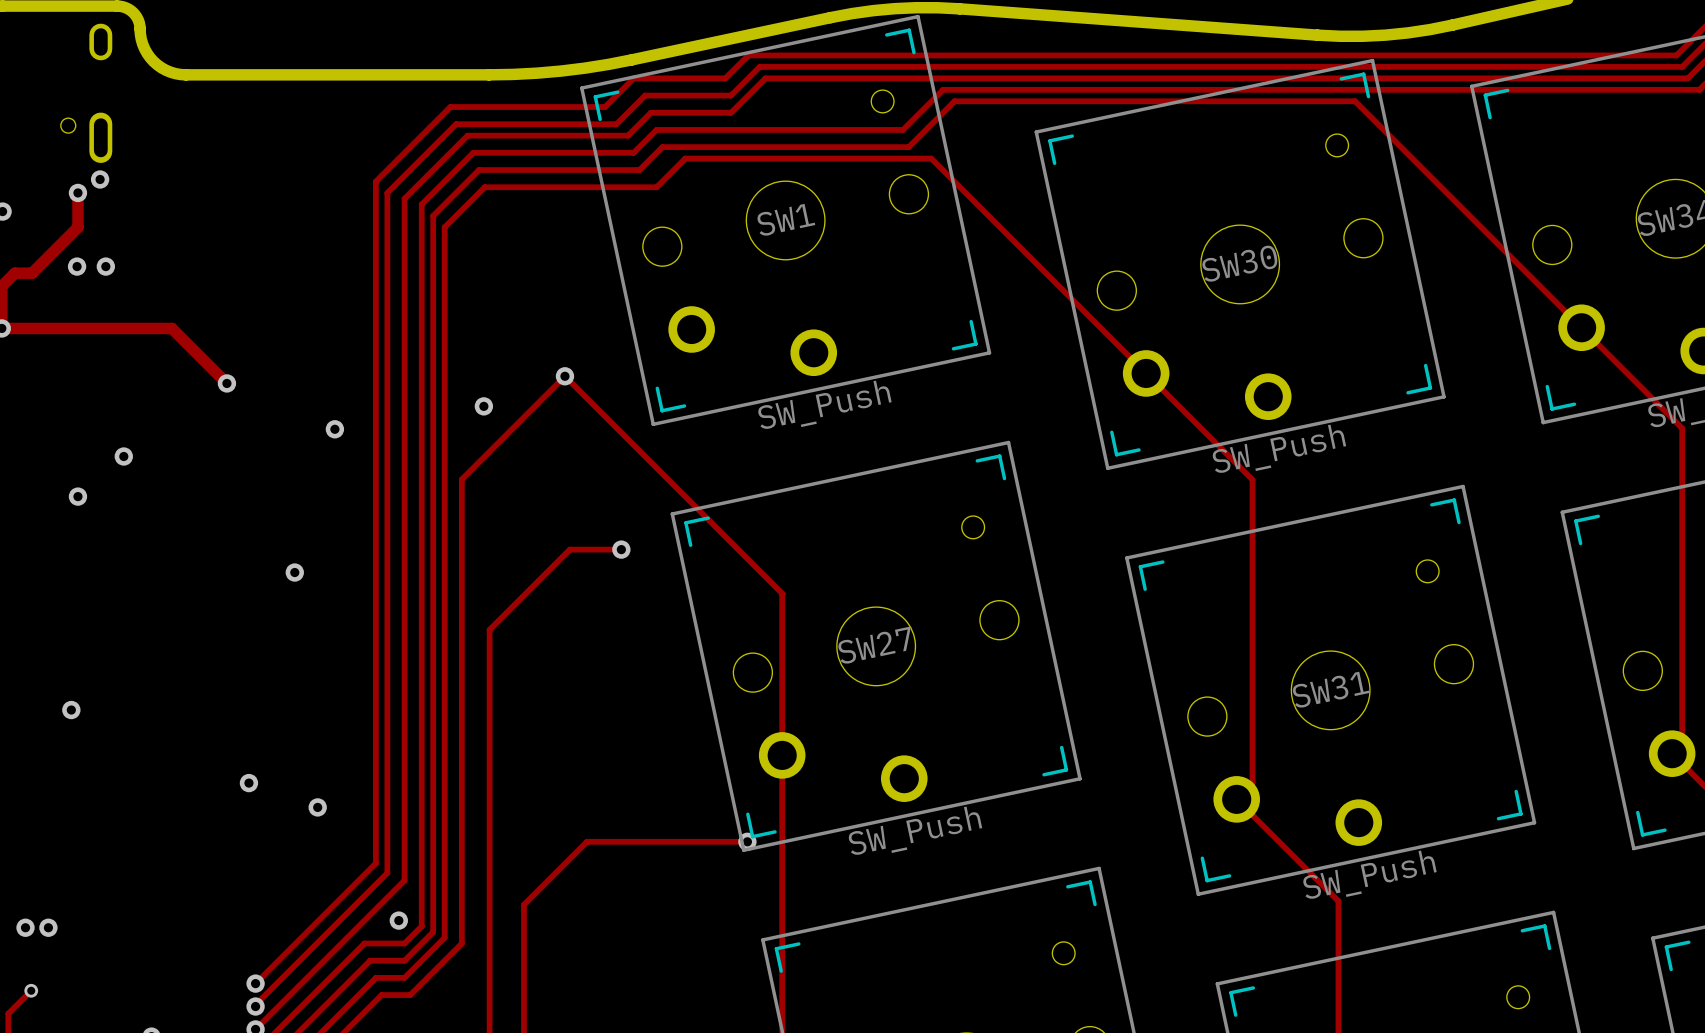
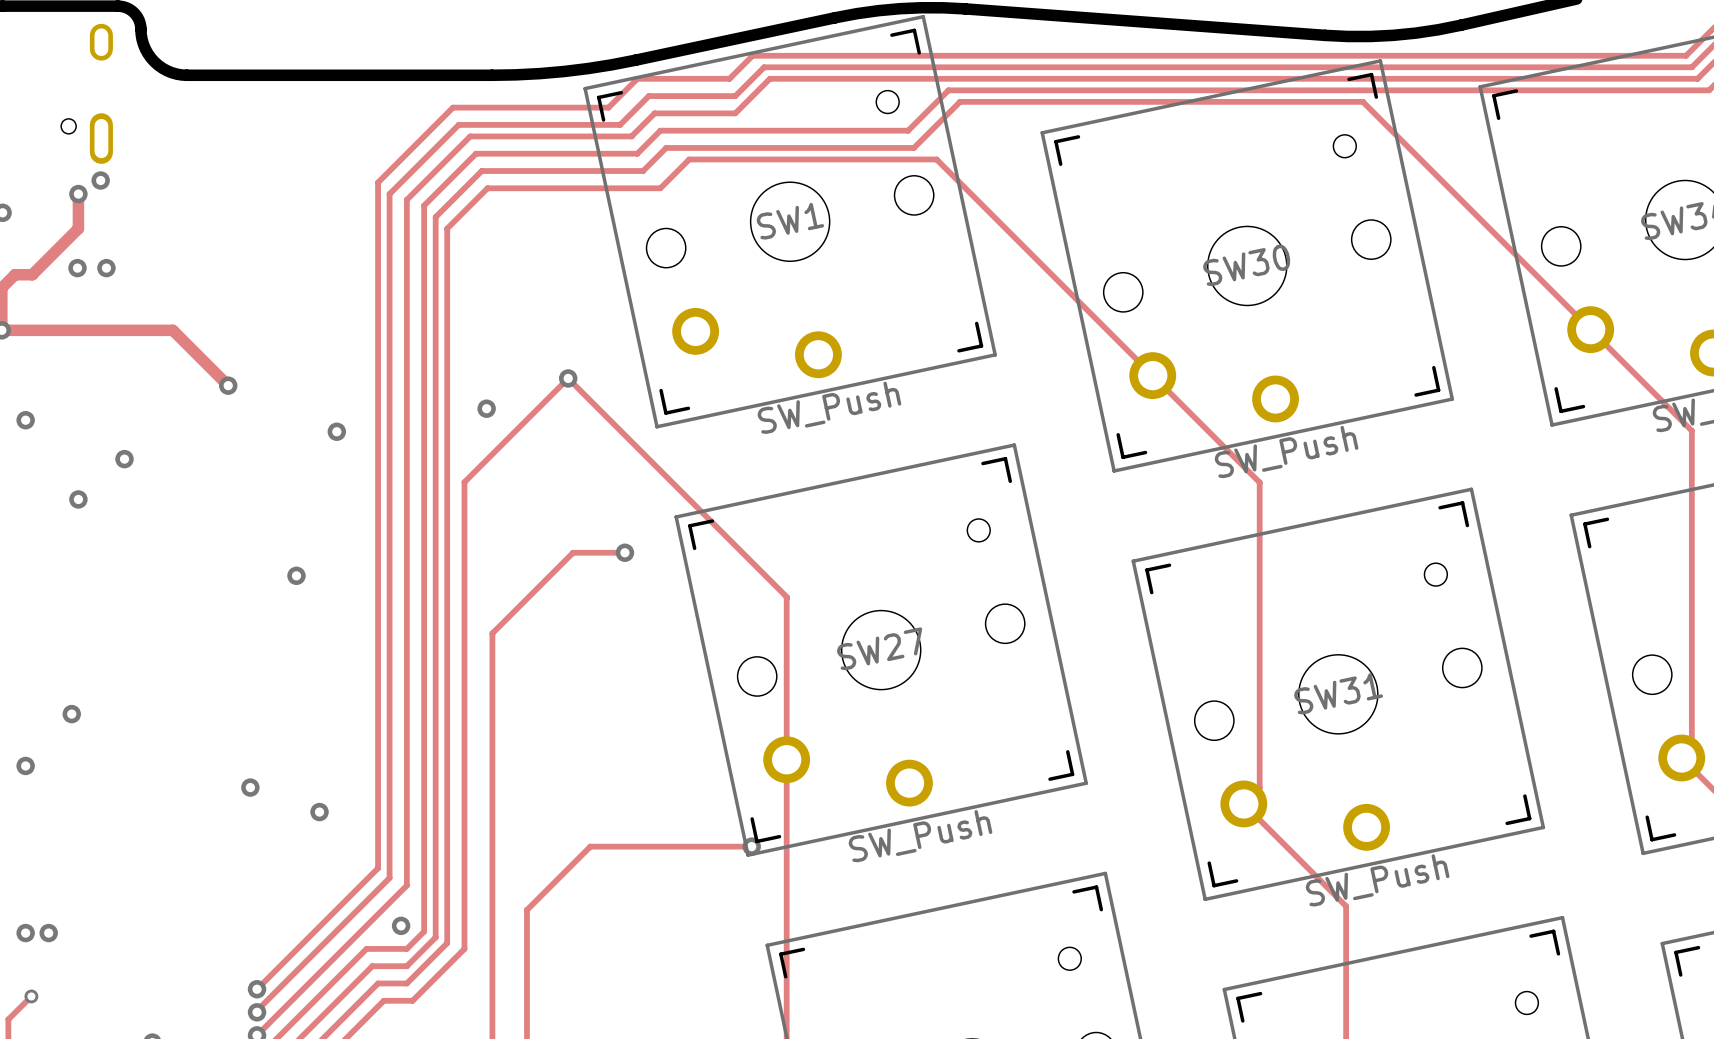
via: none -> (25, 420)
via: none -> (25, 765)

